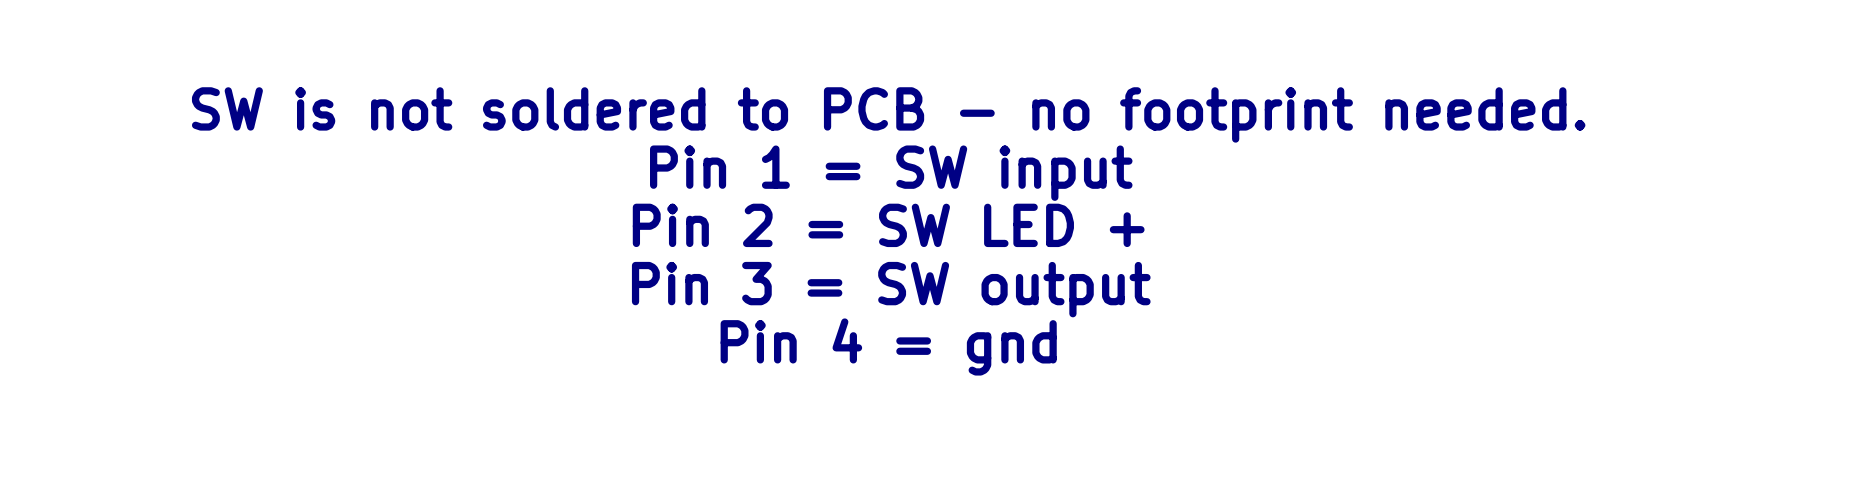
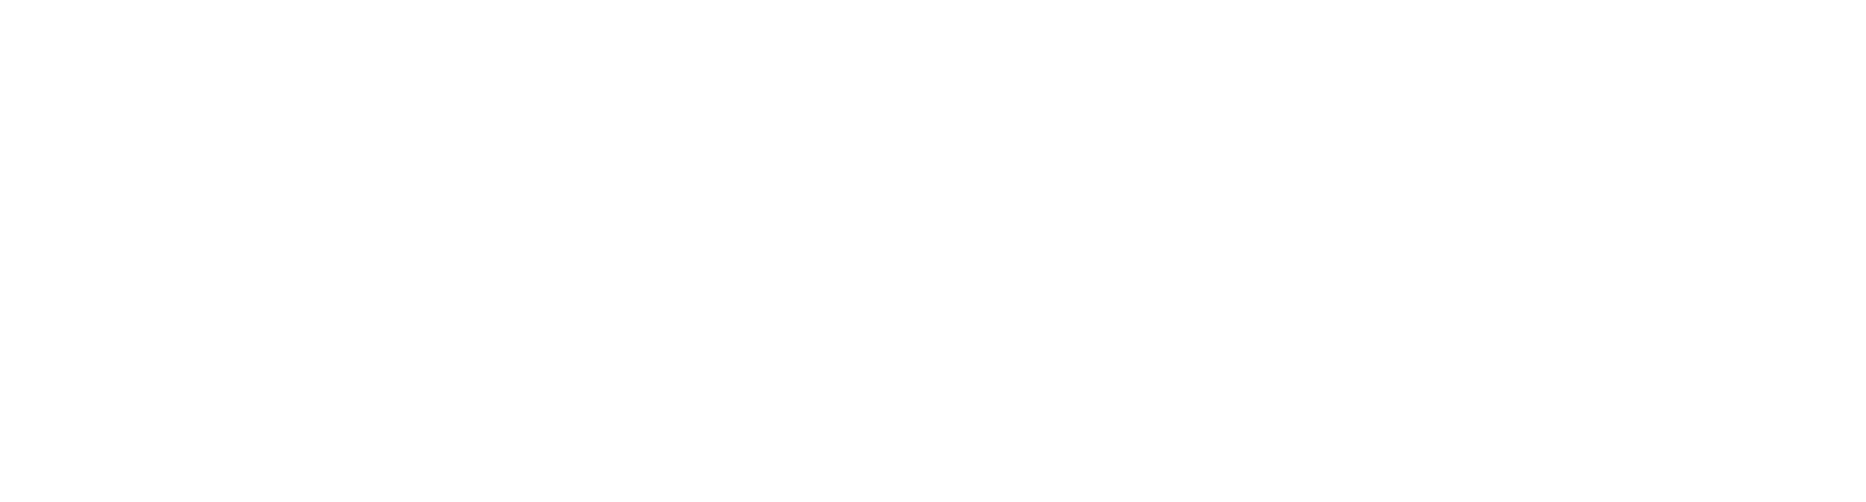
text: SW is not soldered to PCB - no footprint needed. (888, 114) -> none
text: Pin 1 = SW input (891, 173) -> none
text: Pin 2 = SW LED + (888, 225) -> none
text: Pin 3 = SW output (891, 289) -> none
text: Pin 4 = gnd (888, 346) -> none

